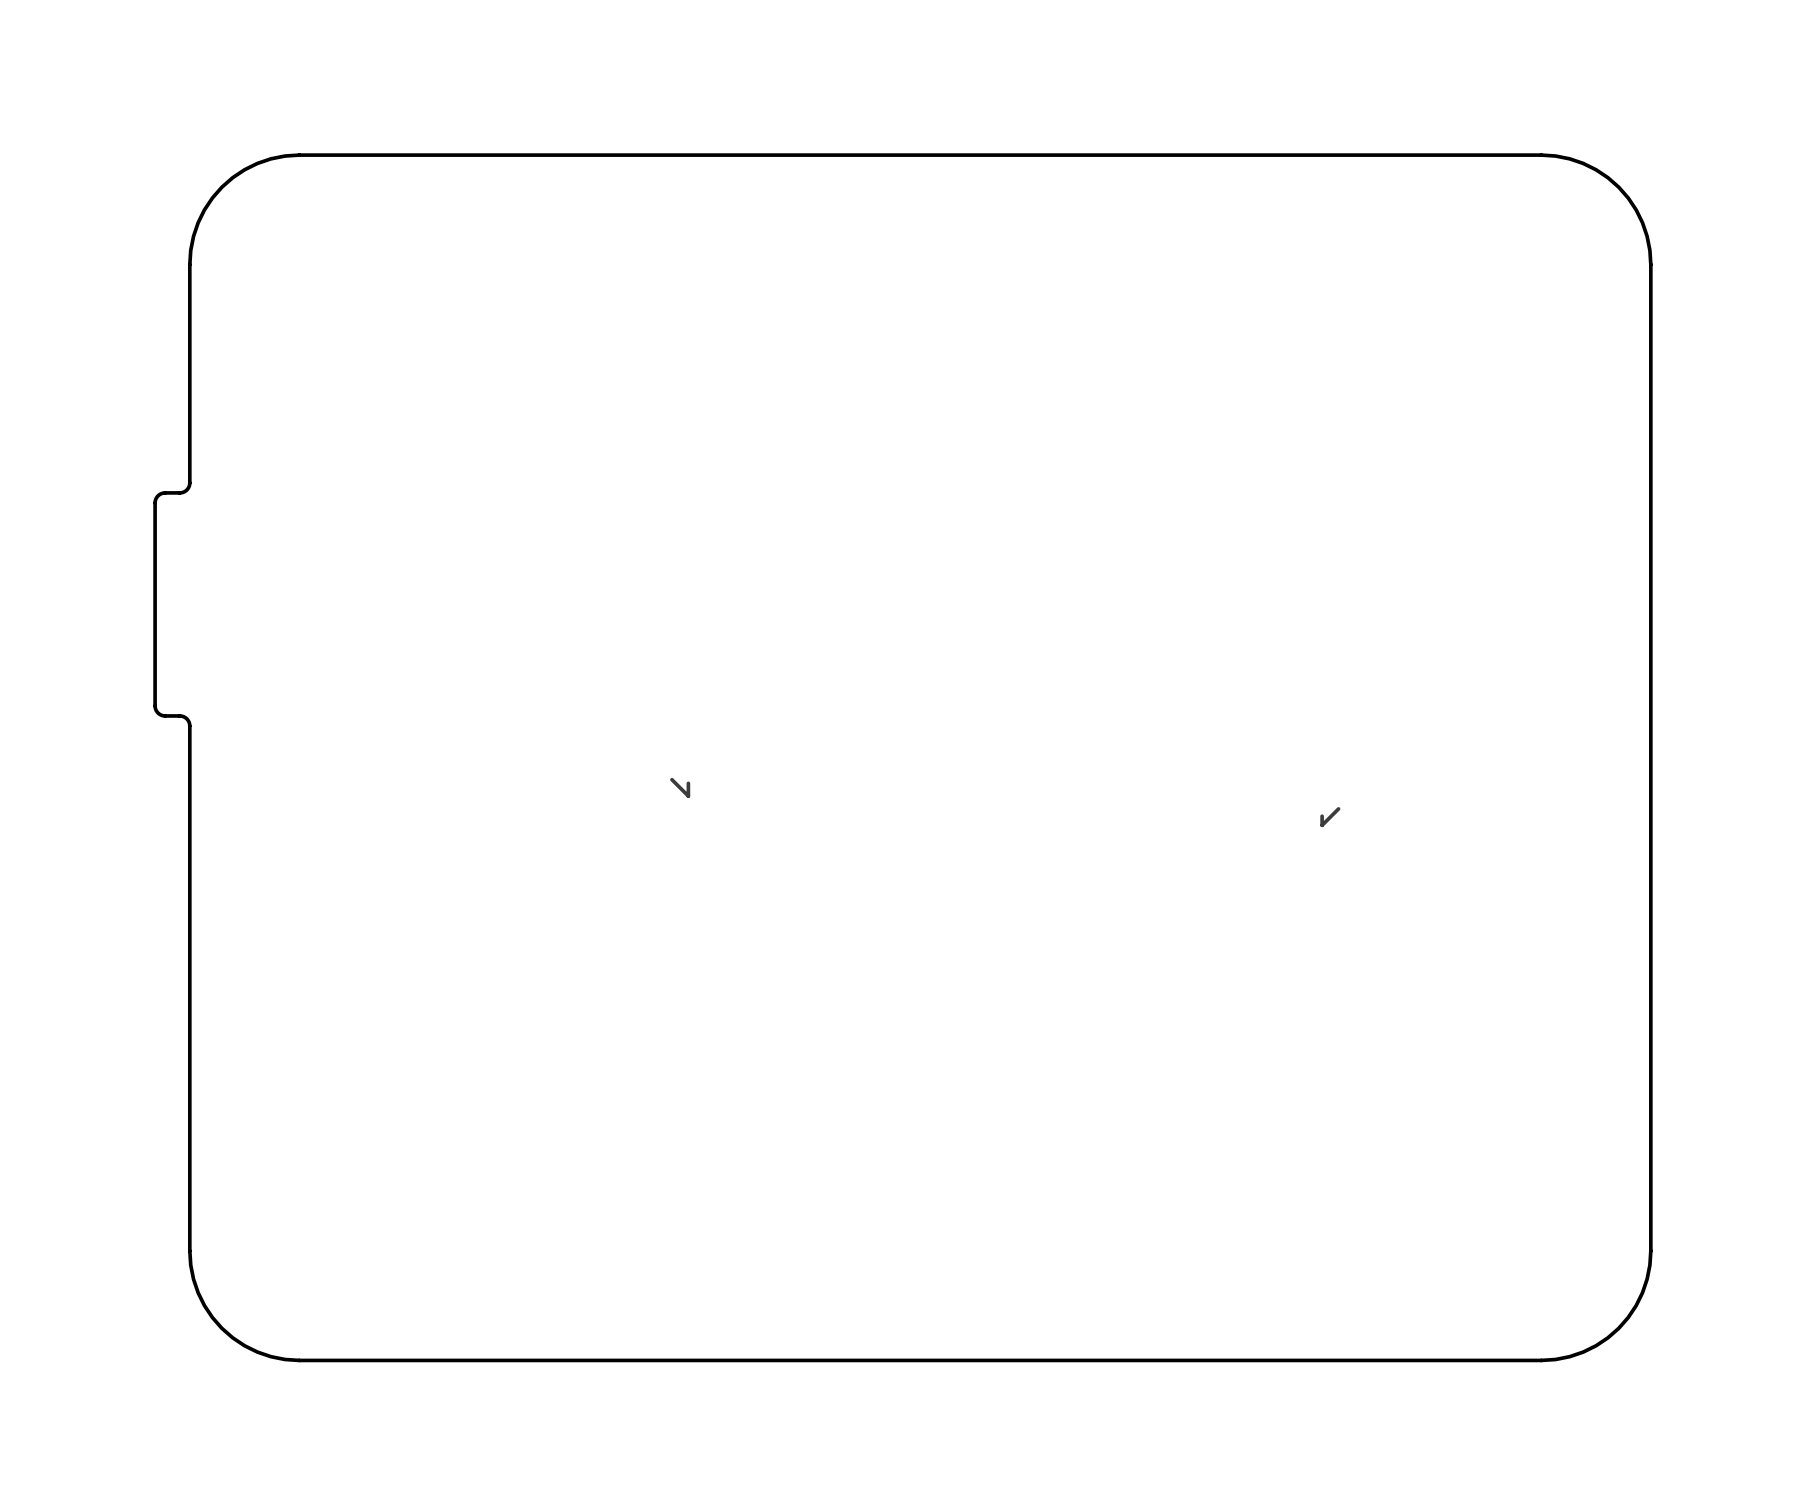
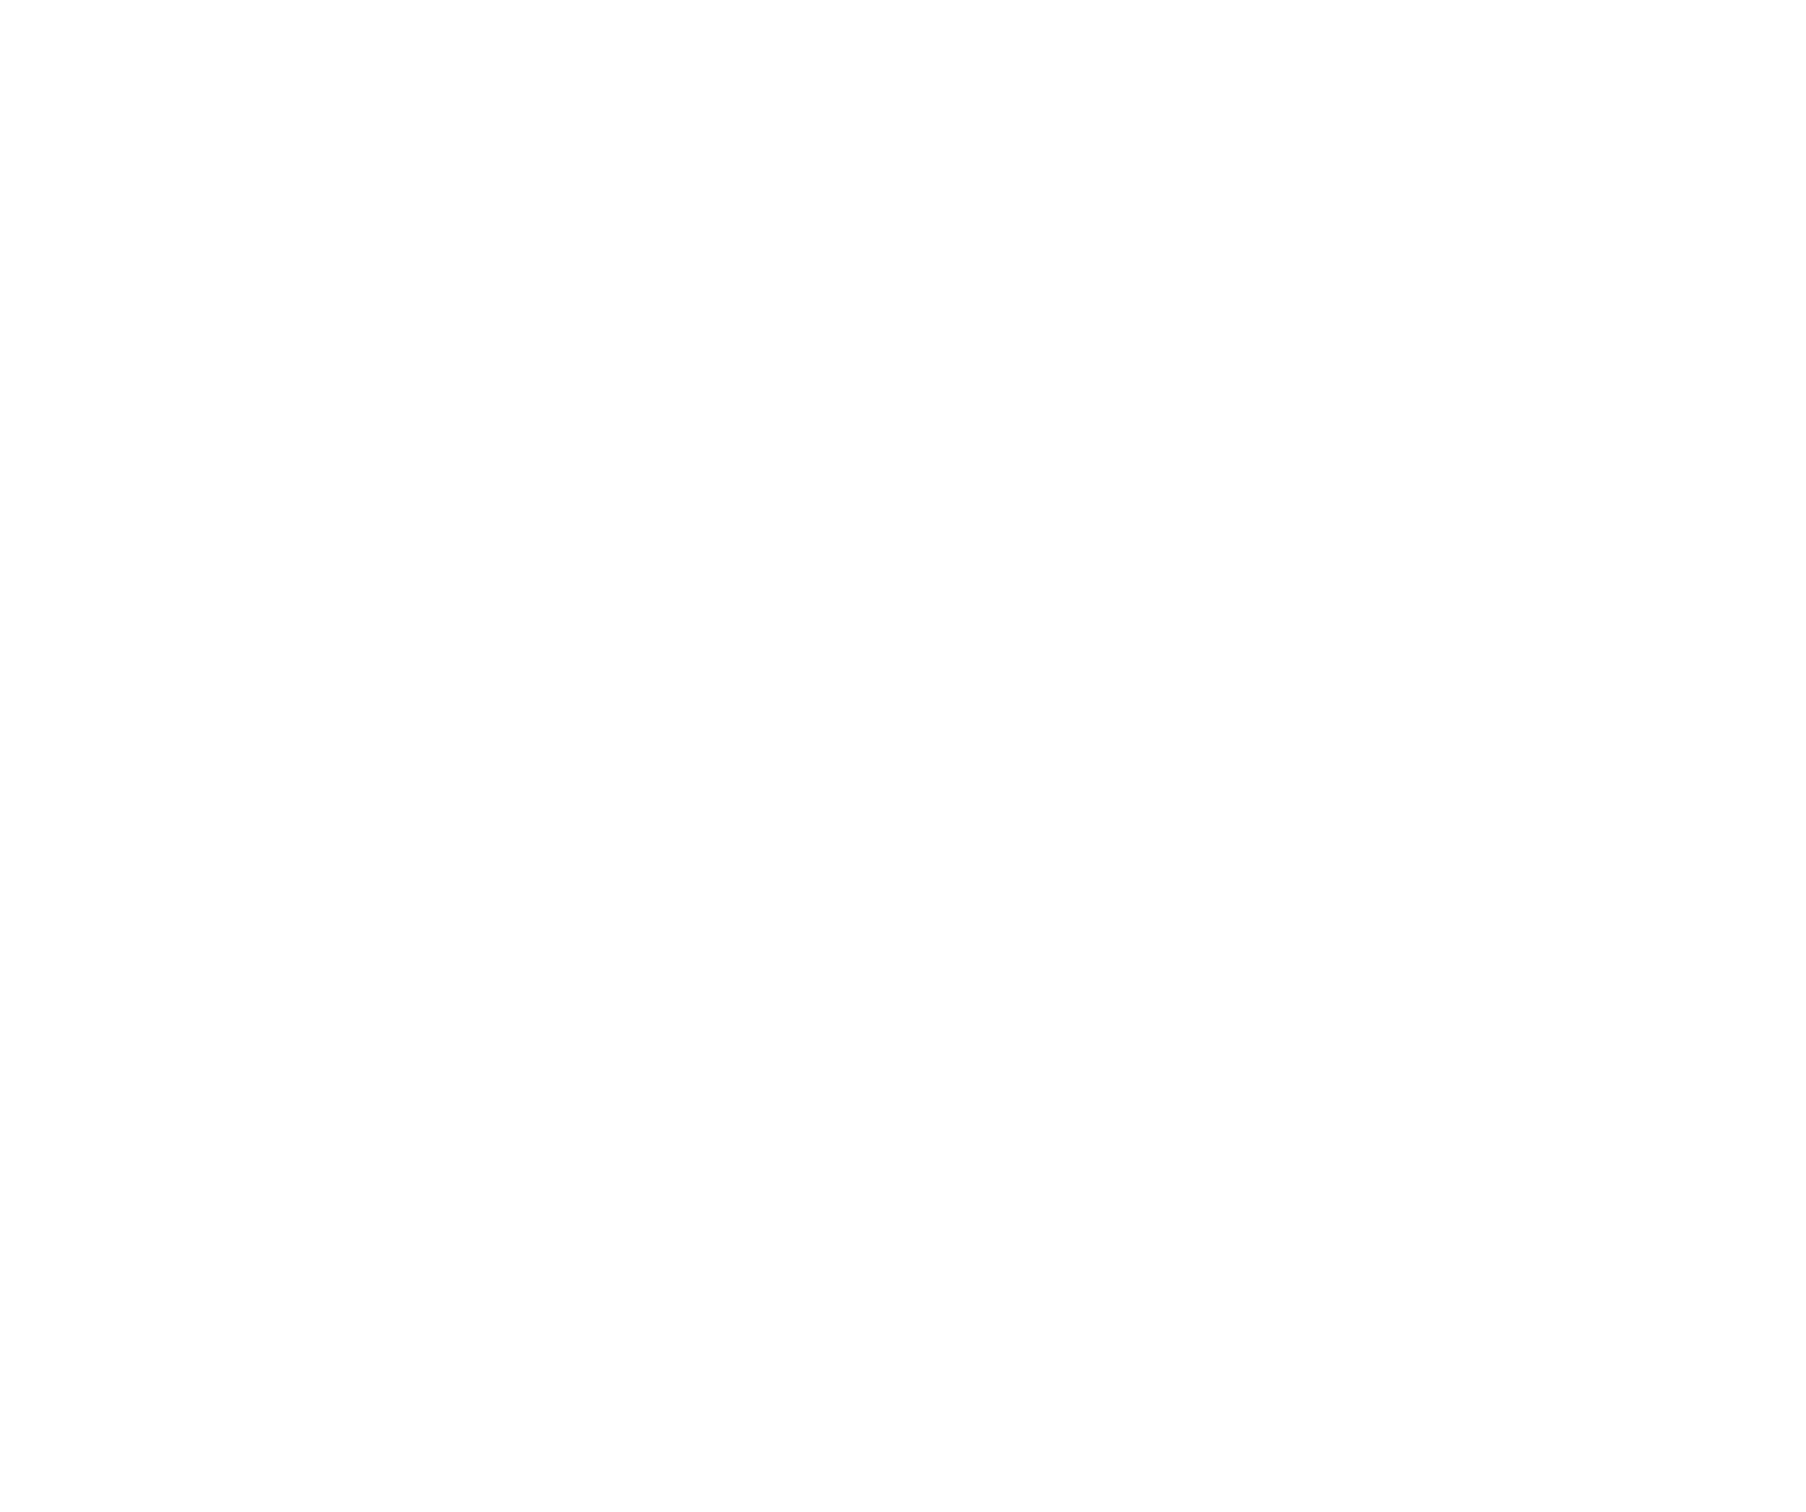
board edge: (165, 715) (158, 713) (155, 705) (155, 502) (160, 494) (183, 492) (189, 484) (190, 250) (198, 222) (212, 197) (232, 177) (257, 163) (285, 156) (299, 155) (1541, 155) (1569, 158) (1583, 163) (1596, 169) (1618, 187) (1636, 209) (1647, 236) (1650, 264) (1650, 1250) (1649, 1265) (1642, 1292) (1628, 1317) (1607, 1337) (1583, 1352) (1569, 1356) (1541, 1360) (299, 1360) (271, 1356) (257, 1352) (232, 1337) (212, 1317) (198, 1292) (190, 1265) (189, 726) -> none
board edge: (165, 715) (183, 716) (187, 719) (189, 726) -> none
line: (671, 779) (688, 796) (688, 783) -> none
line: (1338, 808) (1322, 825) (1322, 816) -> none

